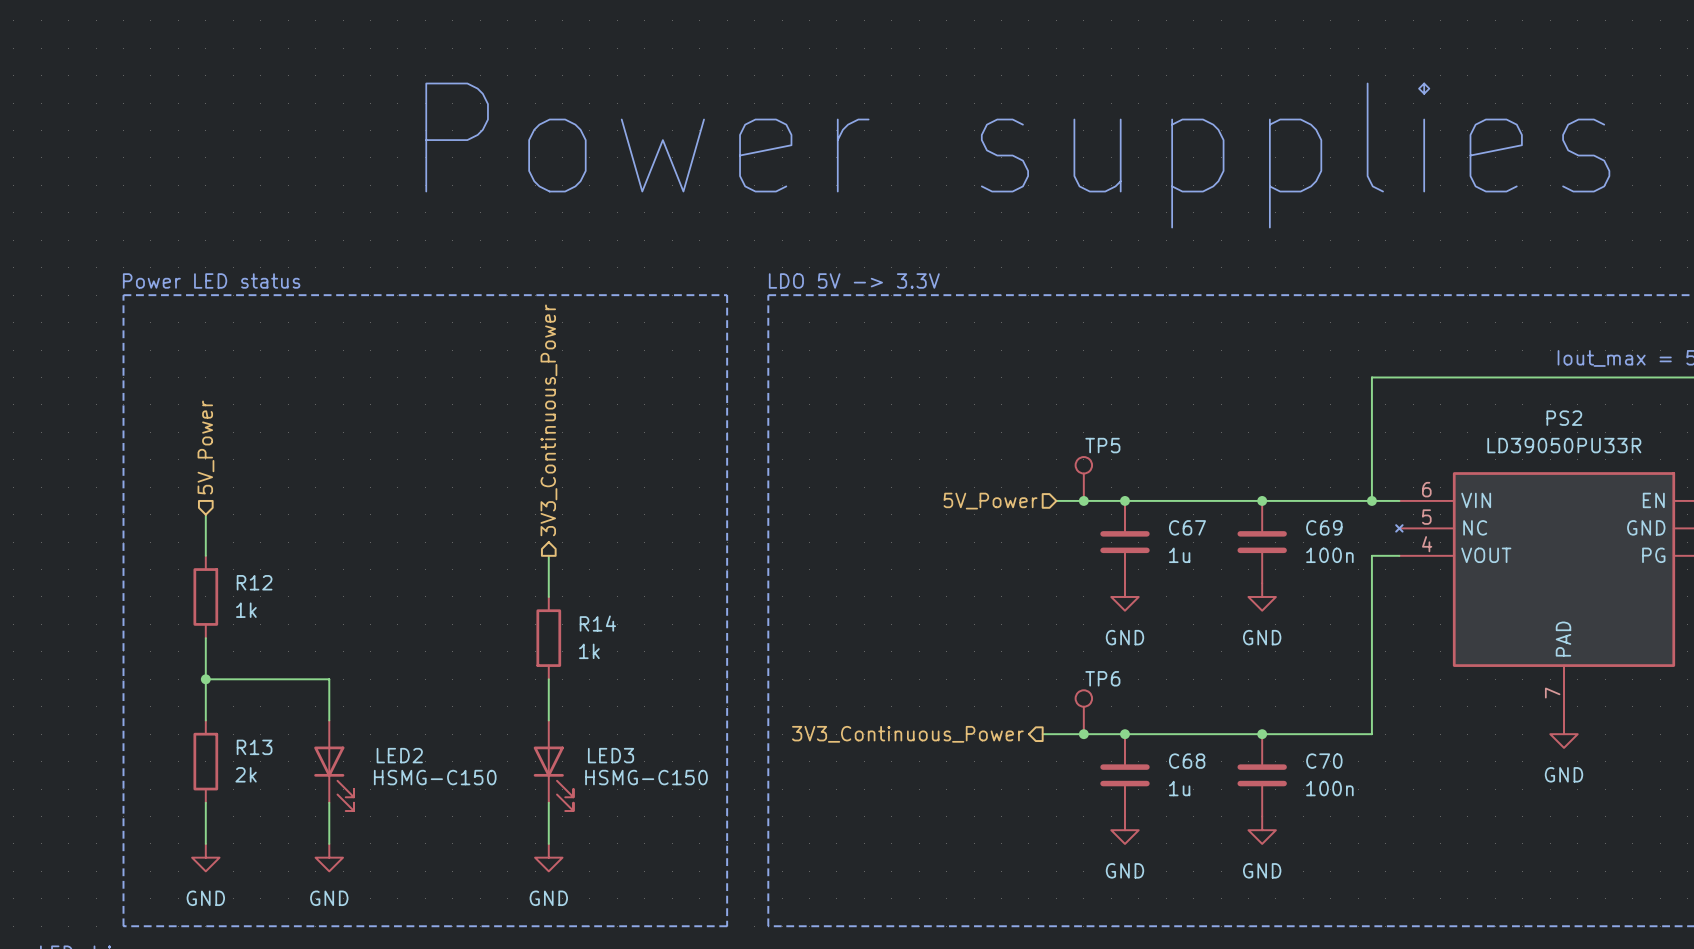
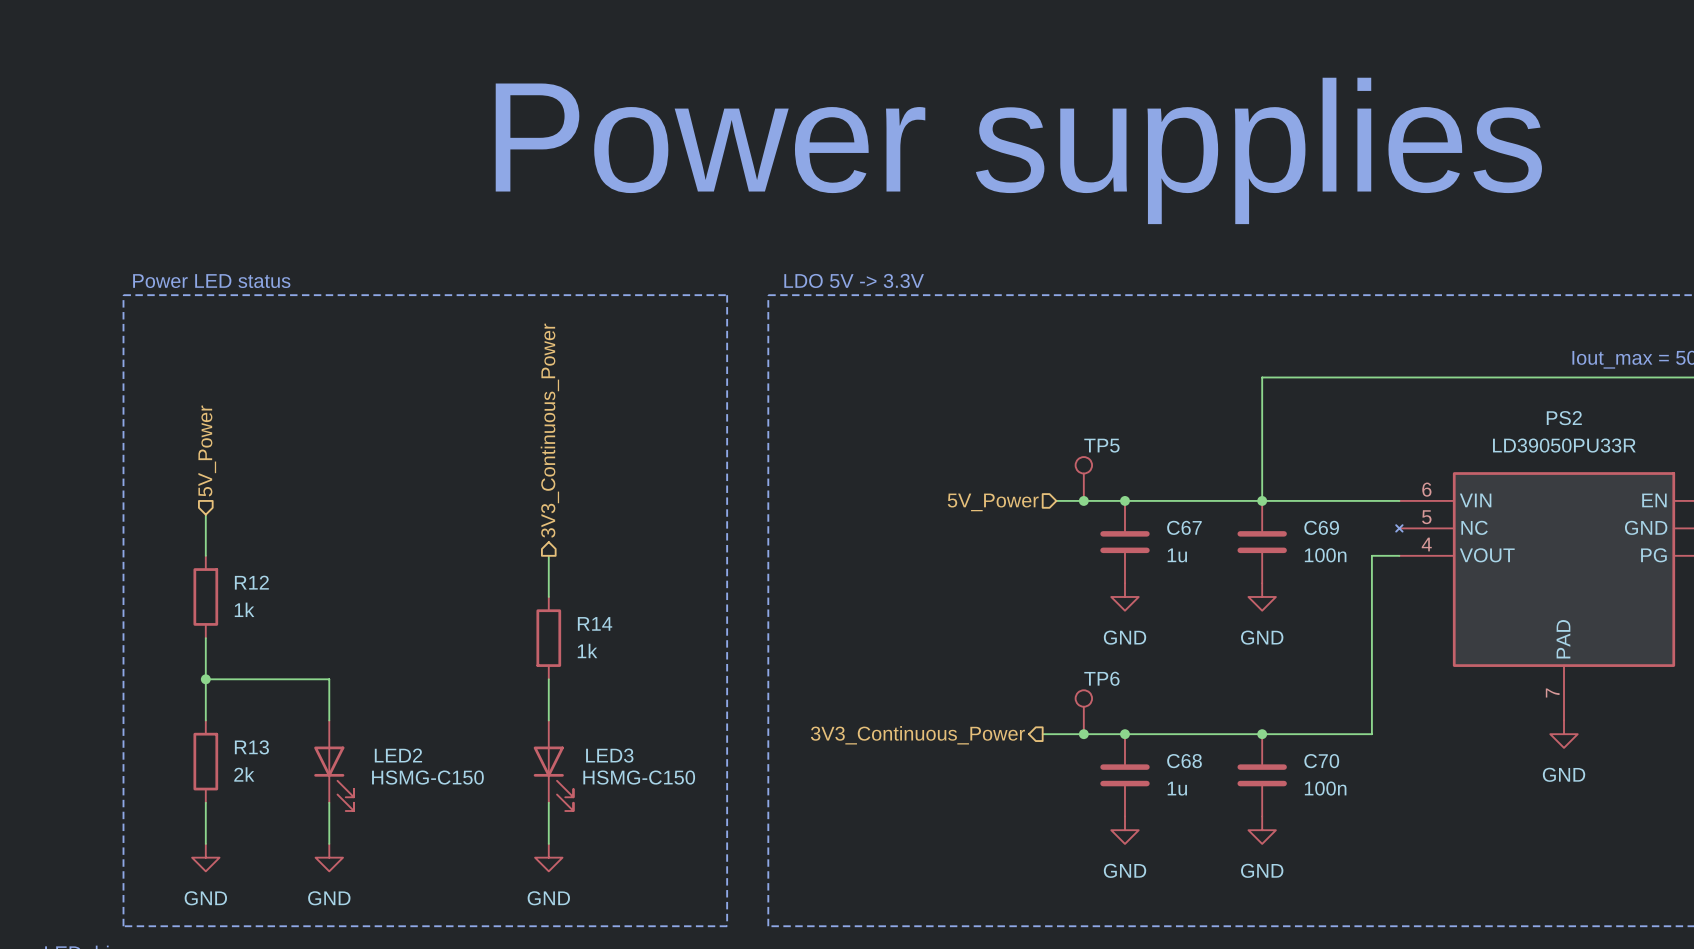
wire: (1371, 377) (1371, 500) -> (1371, 377) (1262, 377) (1262, 500)
junction: (1371, 500) -> none

